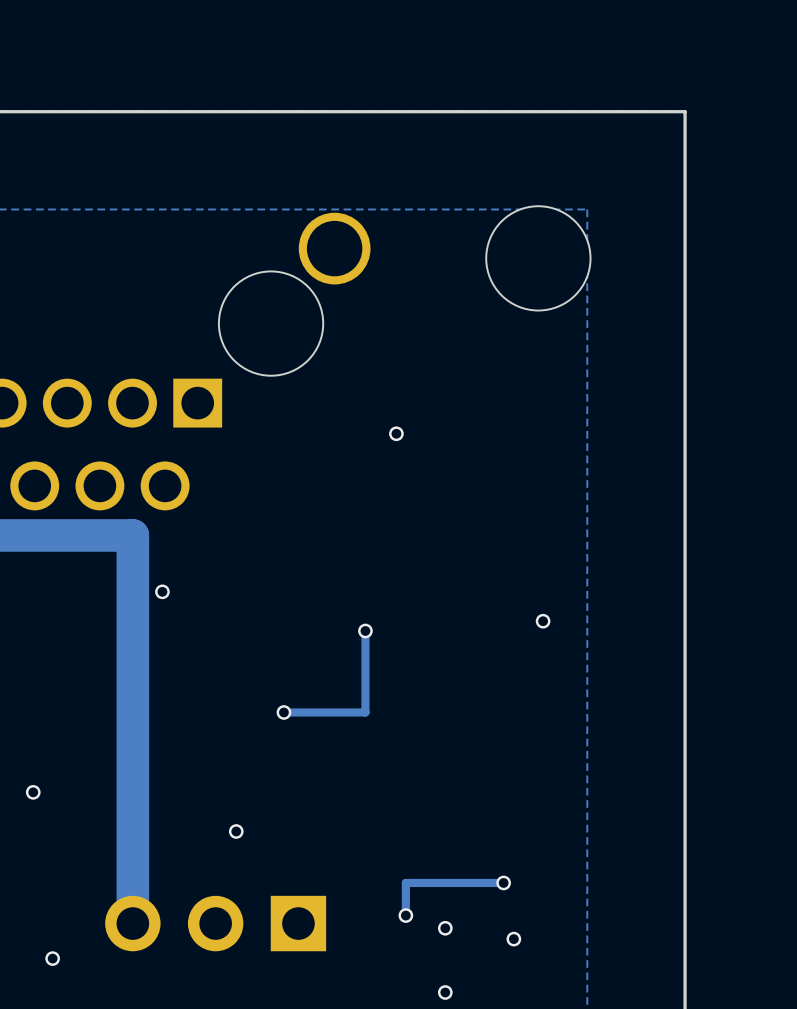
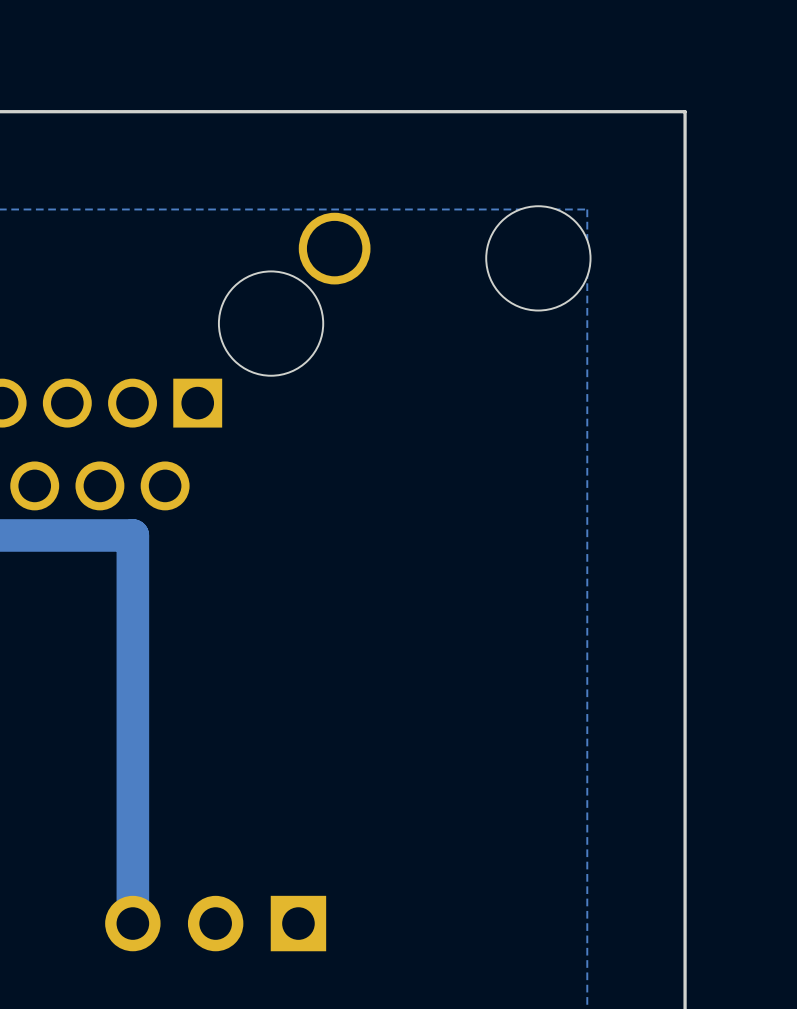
via: (396, 433) -> none
via: (162, 591) -> none
via: (543, 621) -> none
track: (365, 630) (365, 712) (283, 712) -> none
via: (365, 630) -> none
via: (283, 712) -> none
via: (33, 792) -> none
via: (236, 831) -> none
track: (503, 882) (405, 882) (405, 915) -> none
via: (503, 882) -> none
via: (405, 915) -> none
via: (445, 928) -> none
via: (513, 939) -> none
via: (52, 958) -> none
via: (445, 992) -> none

